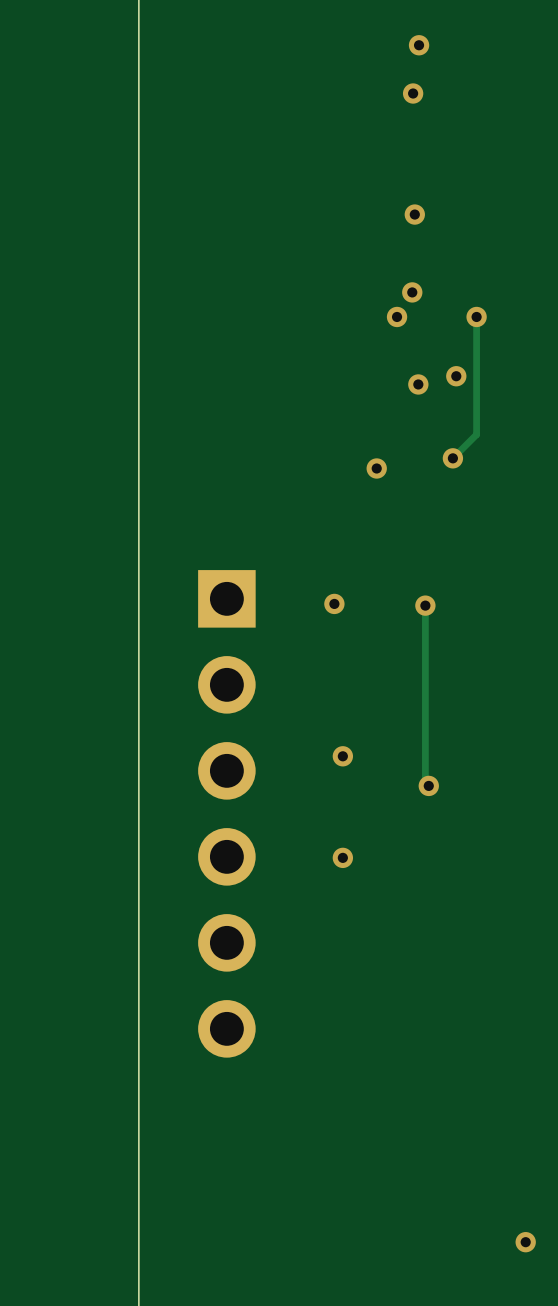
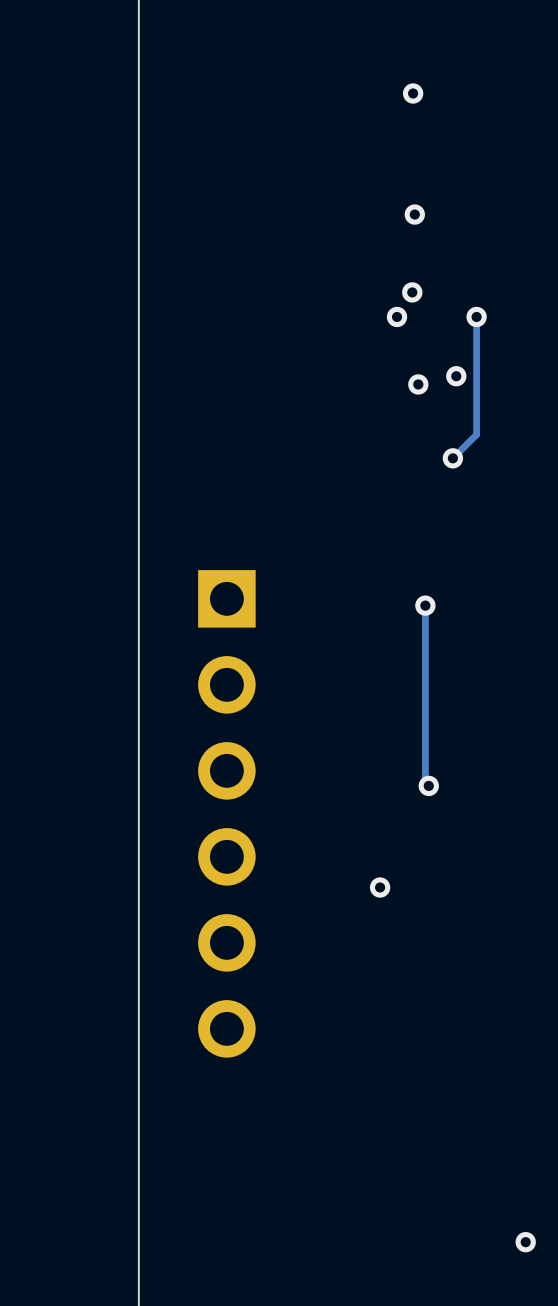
via: (419, 45) -> none
via: (376, 468) -> none
via: (334, 603) -> none
via: (342, 756) -> none
via position: (342, 857) -> (380, 887)

